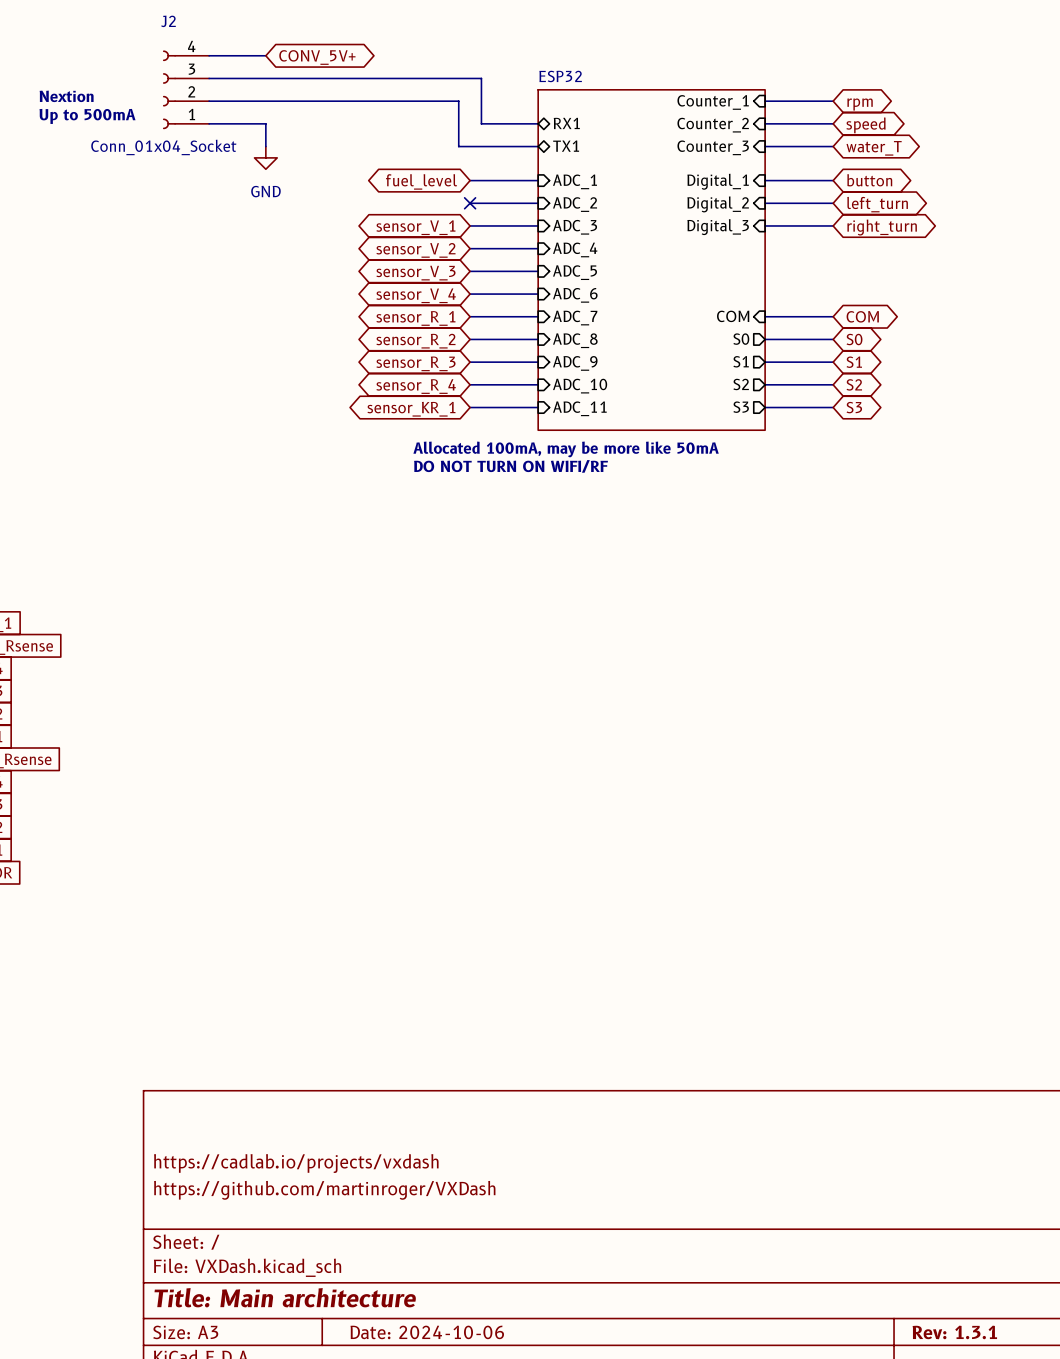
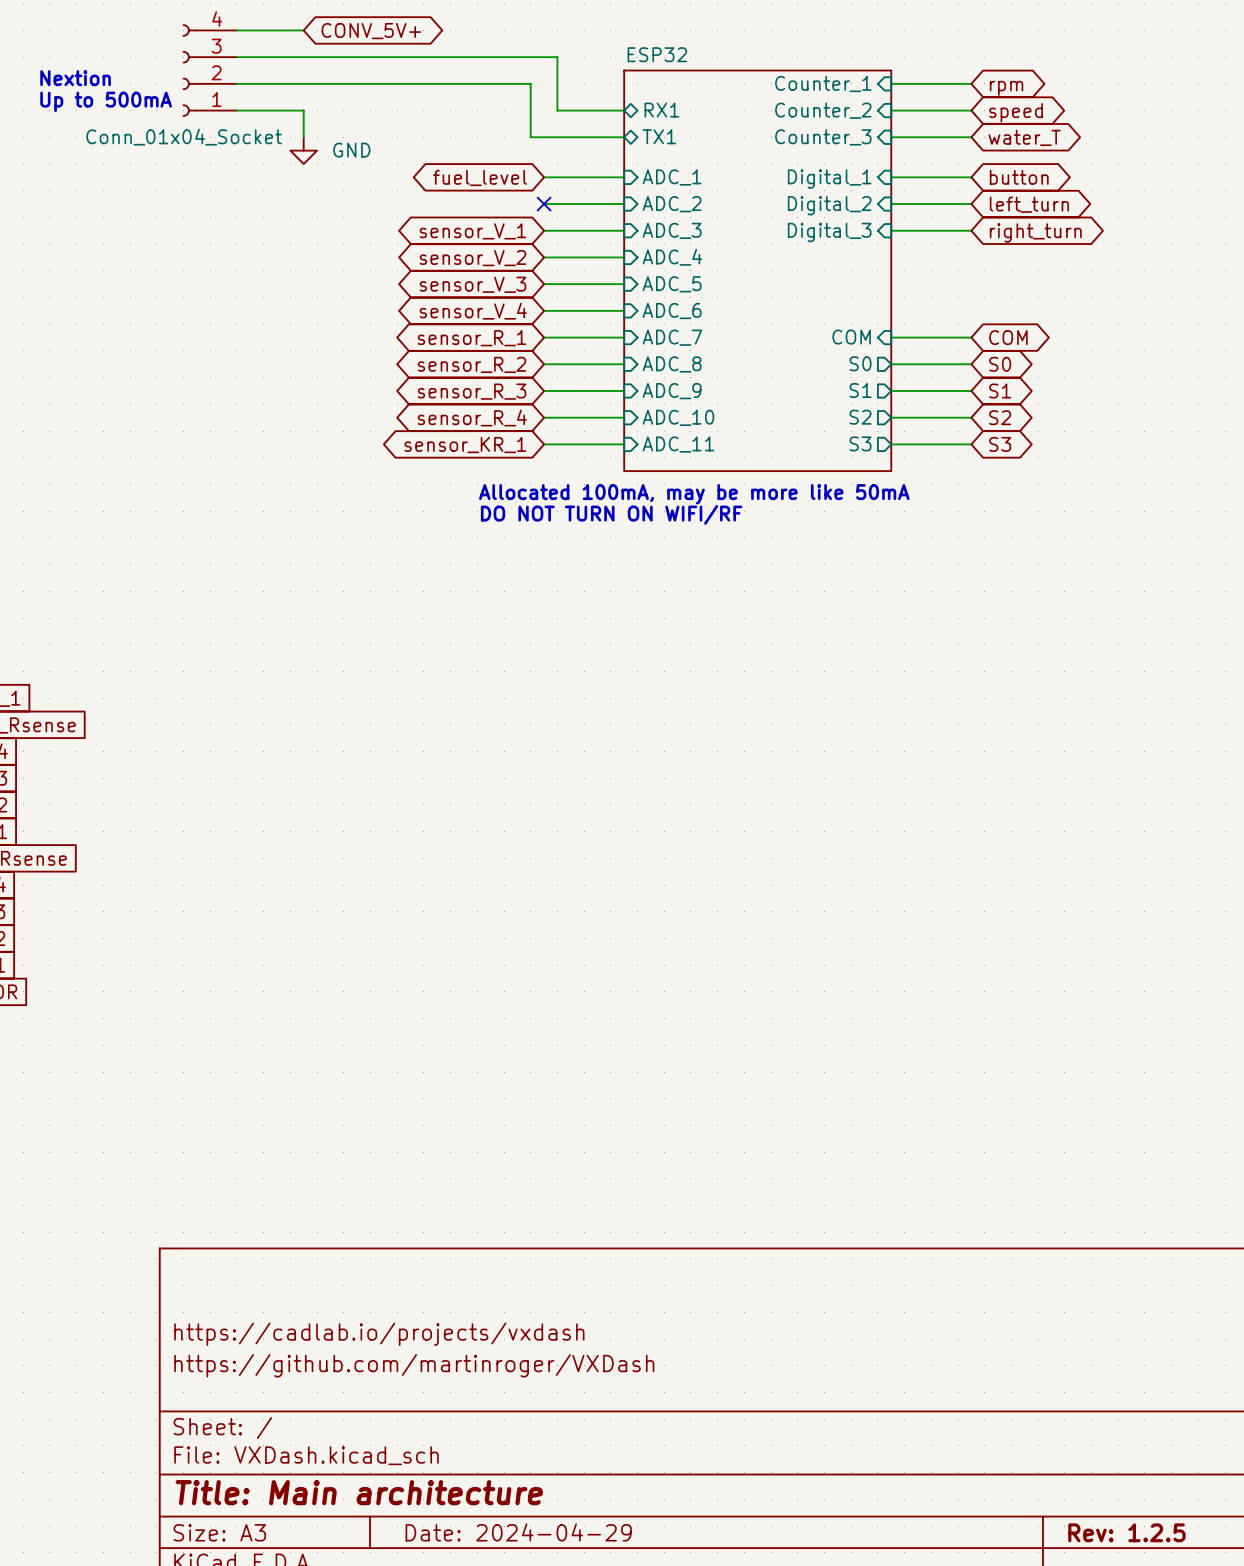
power symbol text position: GND (265, 191) -> GND (351, 150)
title block: Date: 2024-10-06 (427, 1332) -> Date: 2024-04-29 (518, 1532)
title block: Rev: 1.3.1 (954, 1332) -> Rev: 1.2.5 (1126, 1532)

